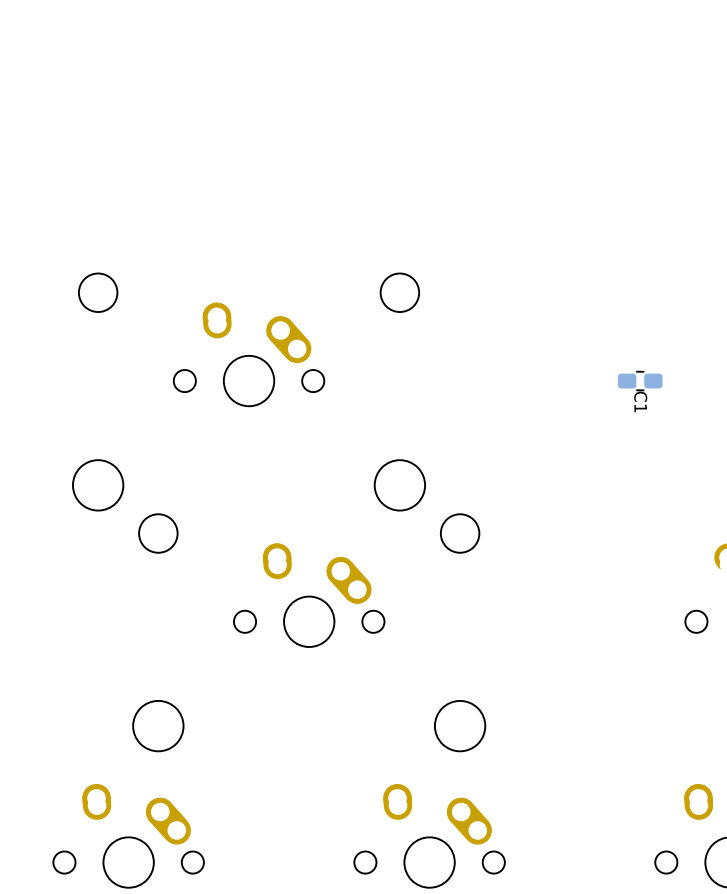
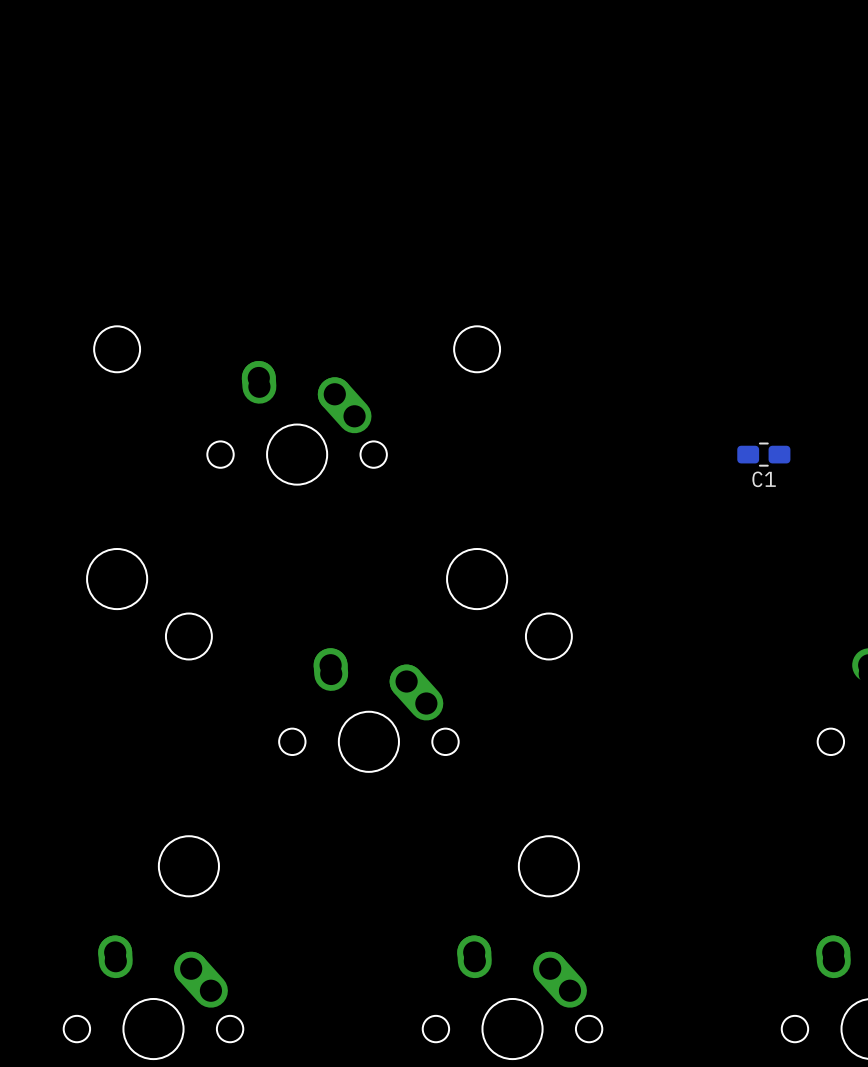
C1 name rotation: 0° (640, 401) -> 90° counterclockwise (764, 479)

